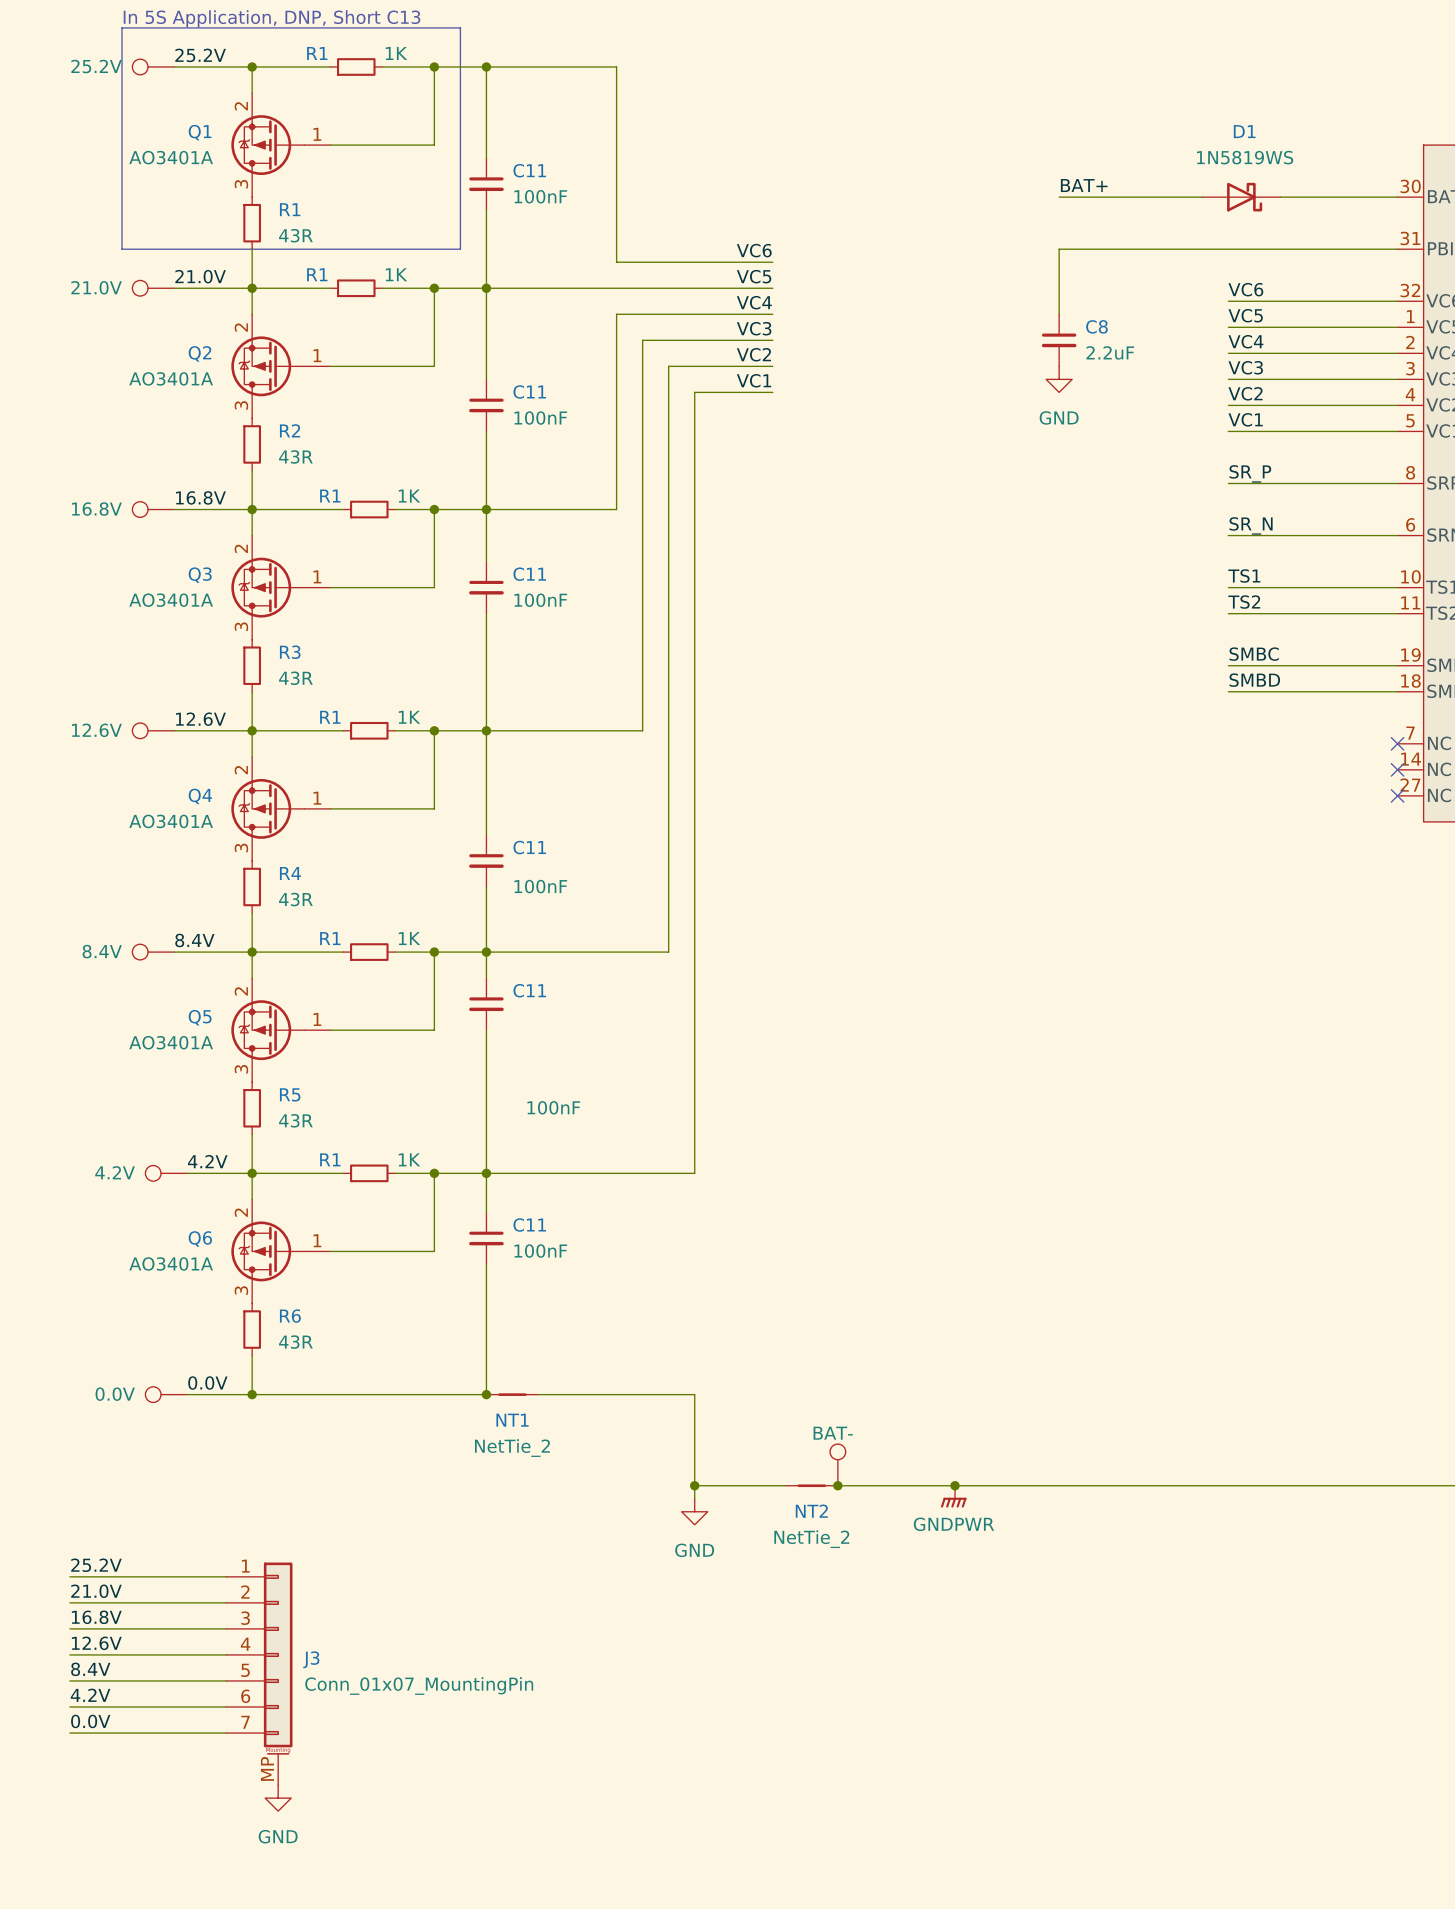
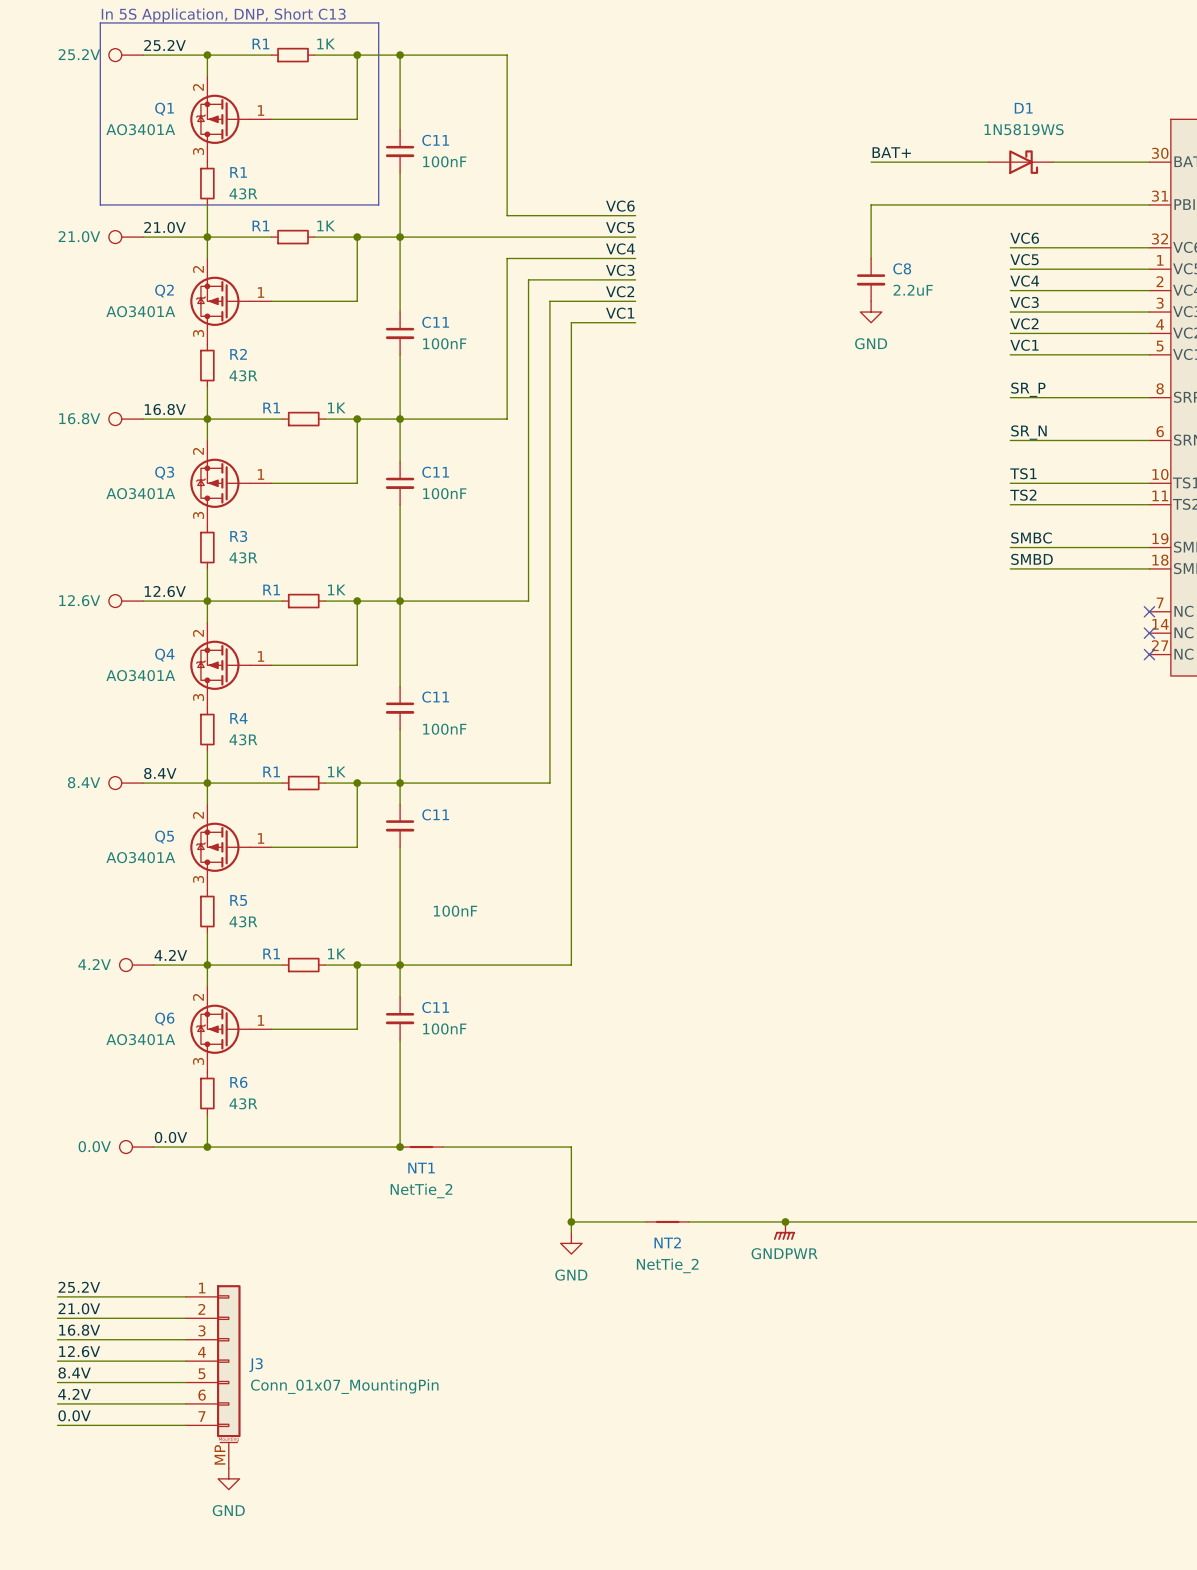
part: BAT- (837, 1464) -> none
junction: (837, 1485) -> none

